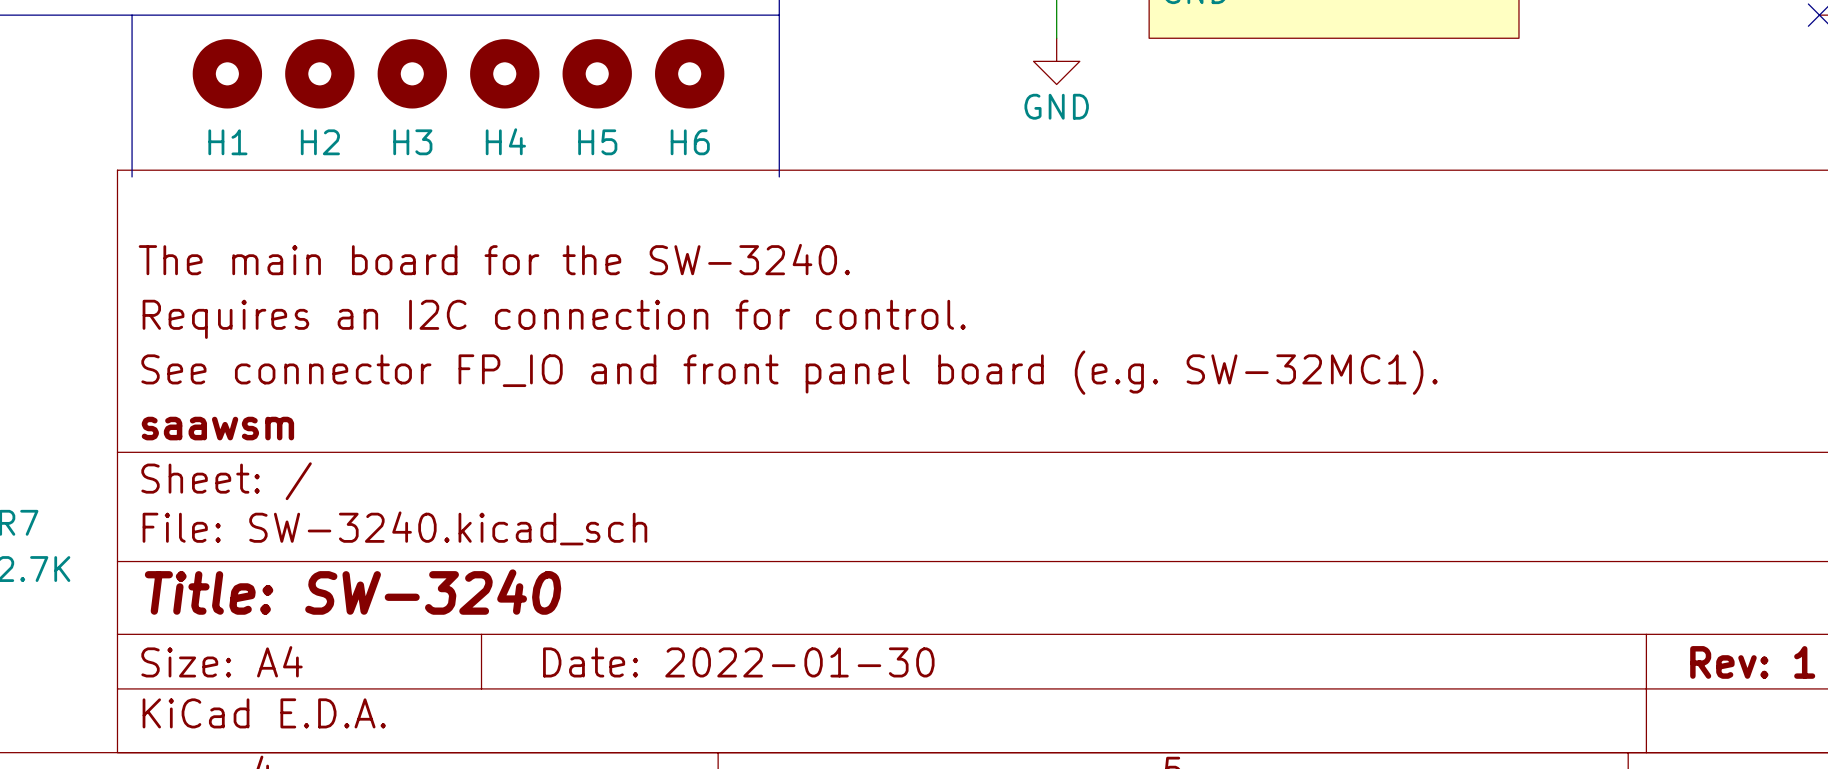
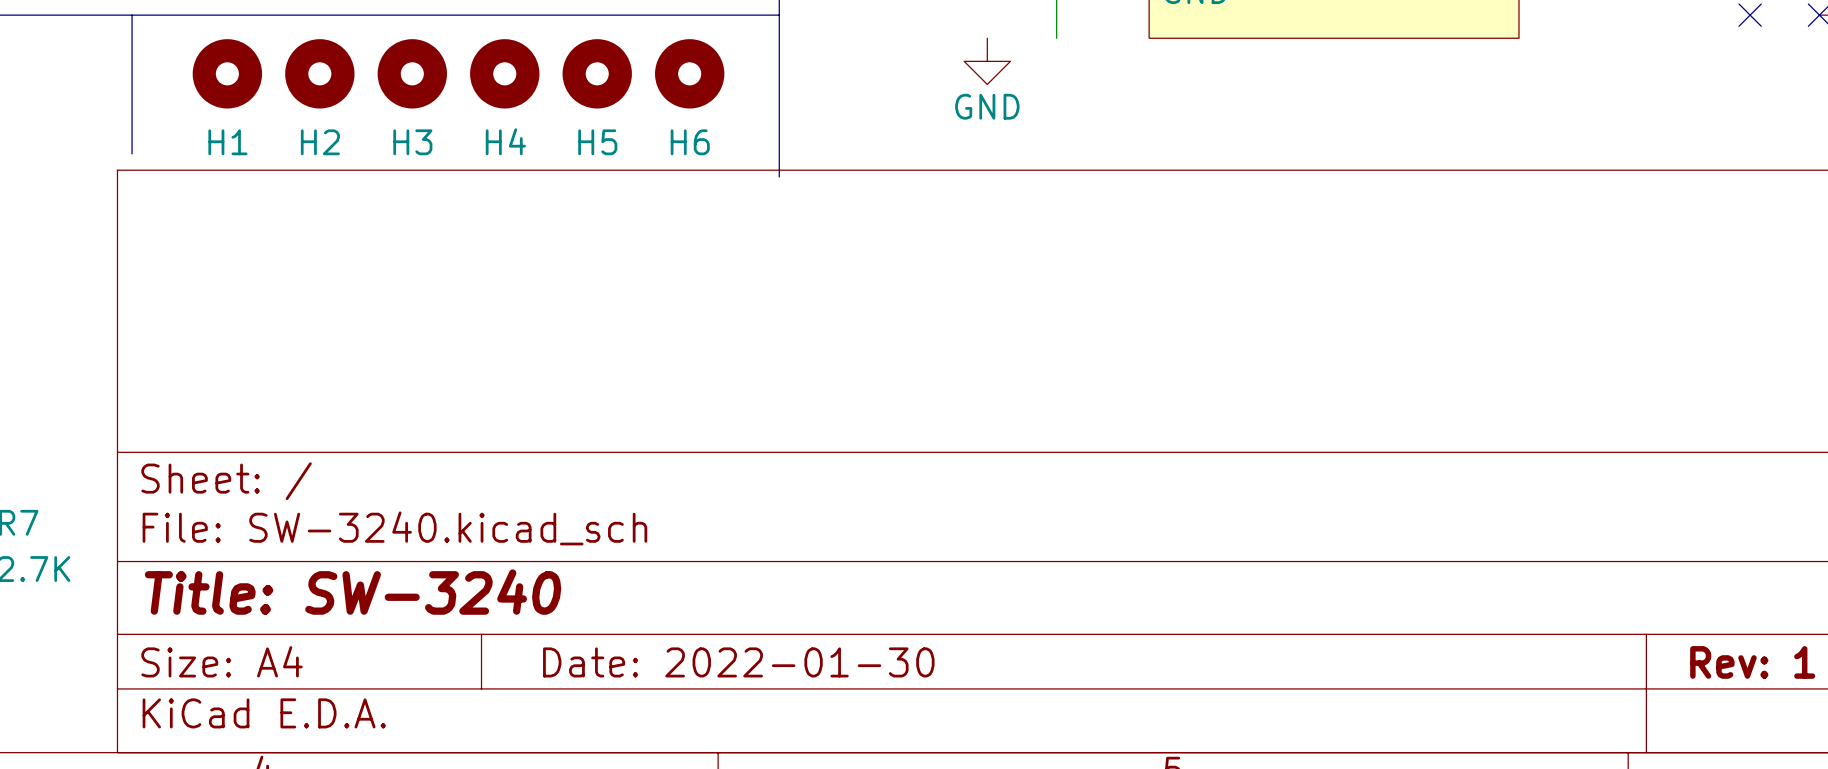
no-connect mark: none -> (1750, 15)
power symbol position: GND (1056, 61) -> GND (987, 61)
line: (132, 153) (132, 176) -> none
title block: The main board for the SW-3240. (494, 259) -> none
title block: Requires an I2C connection for control. (554, 319) -> none
title block: See connector FP_IO and front panel board (e.g. SW-32MC1). (789, 372) -> none
title block: saawsm (217, 428) -> none

